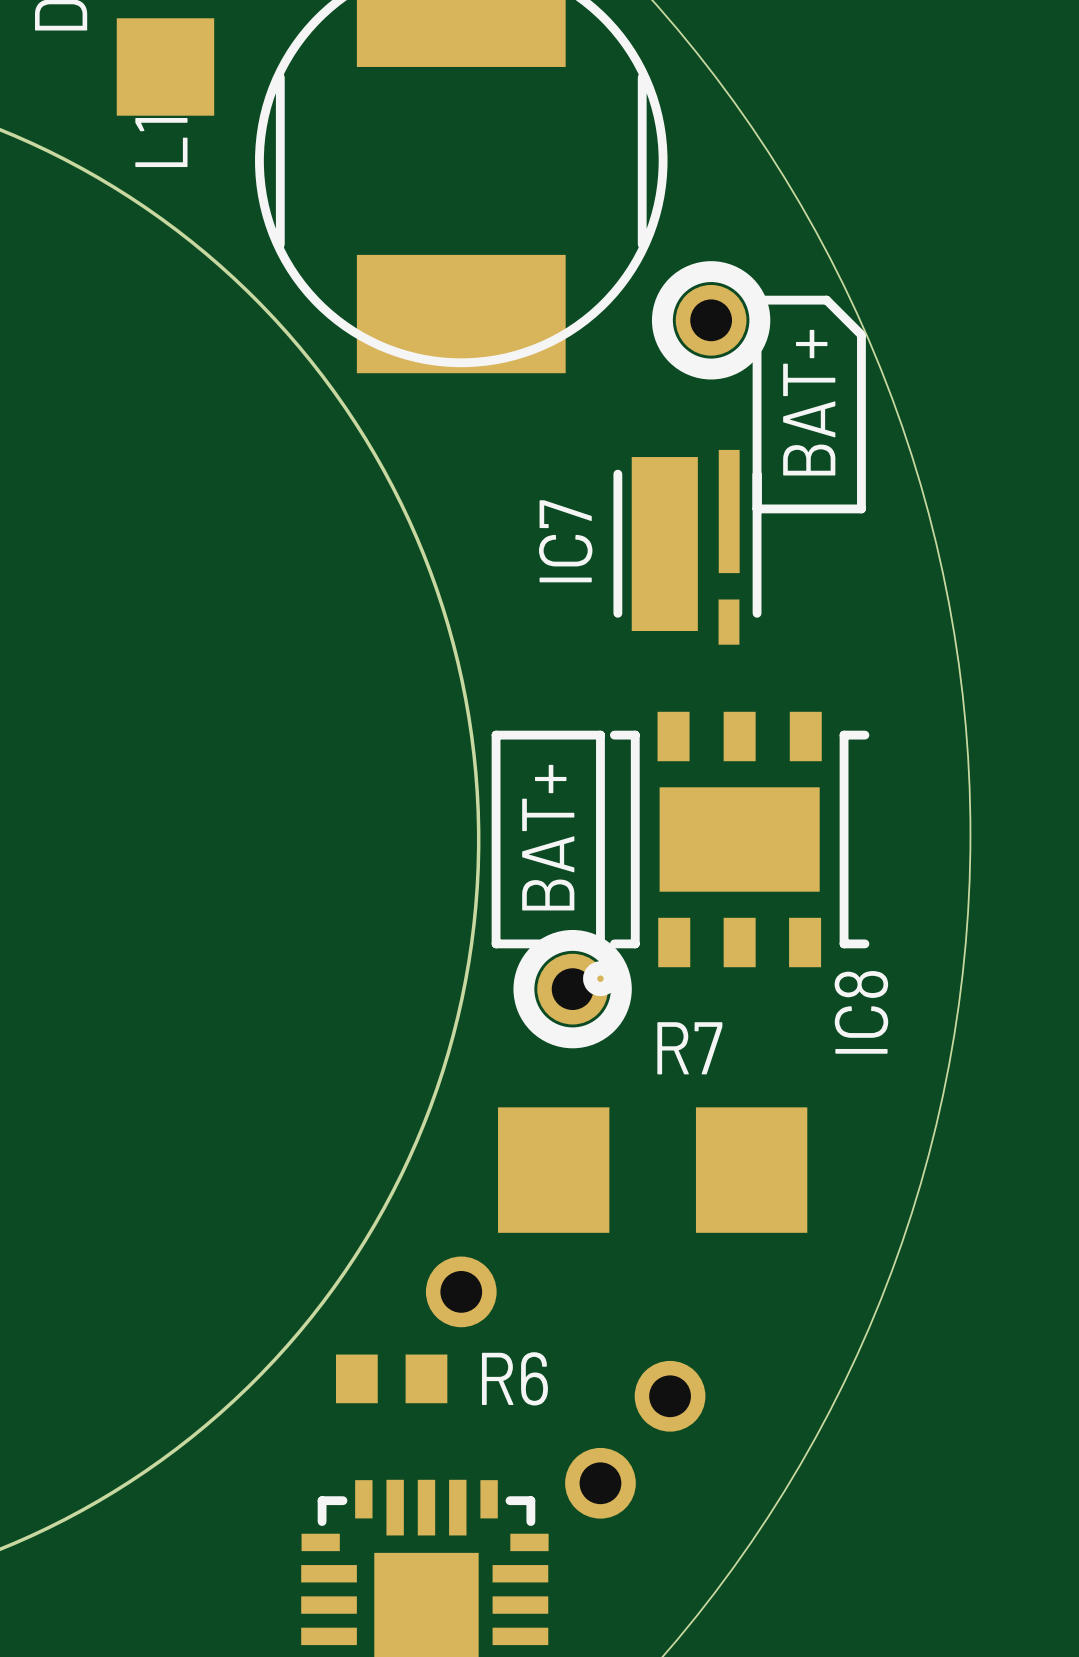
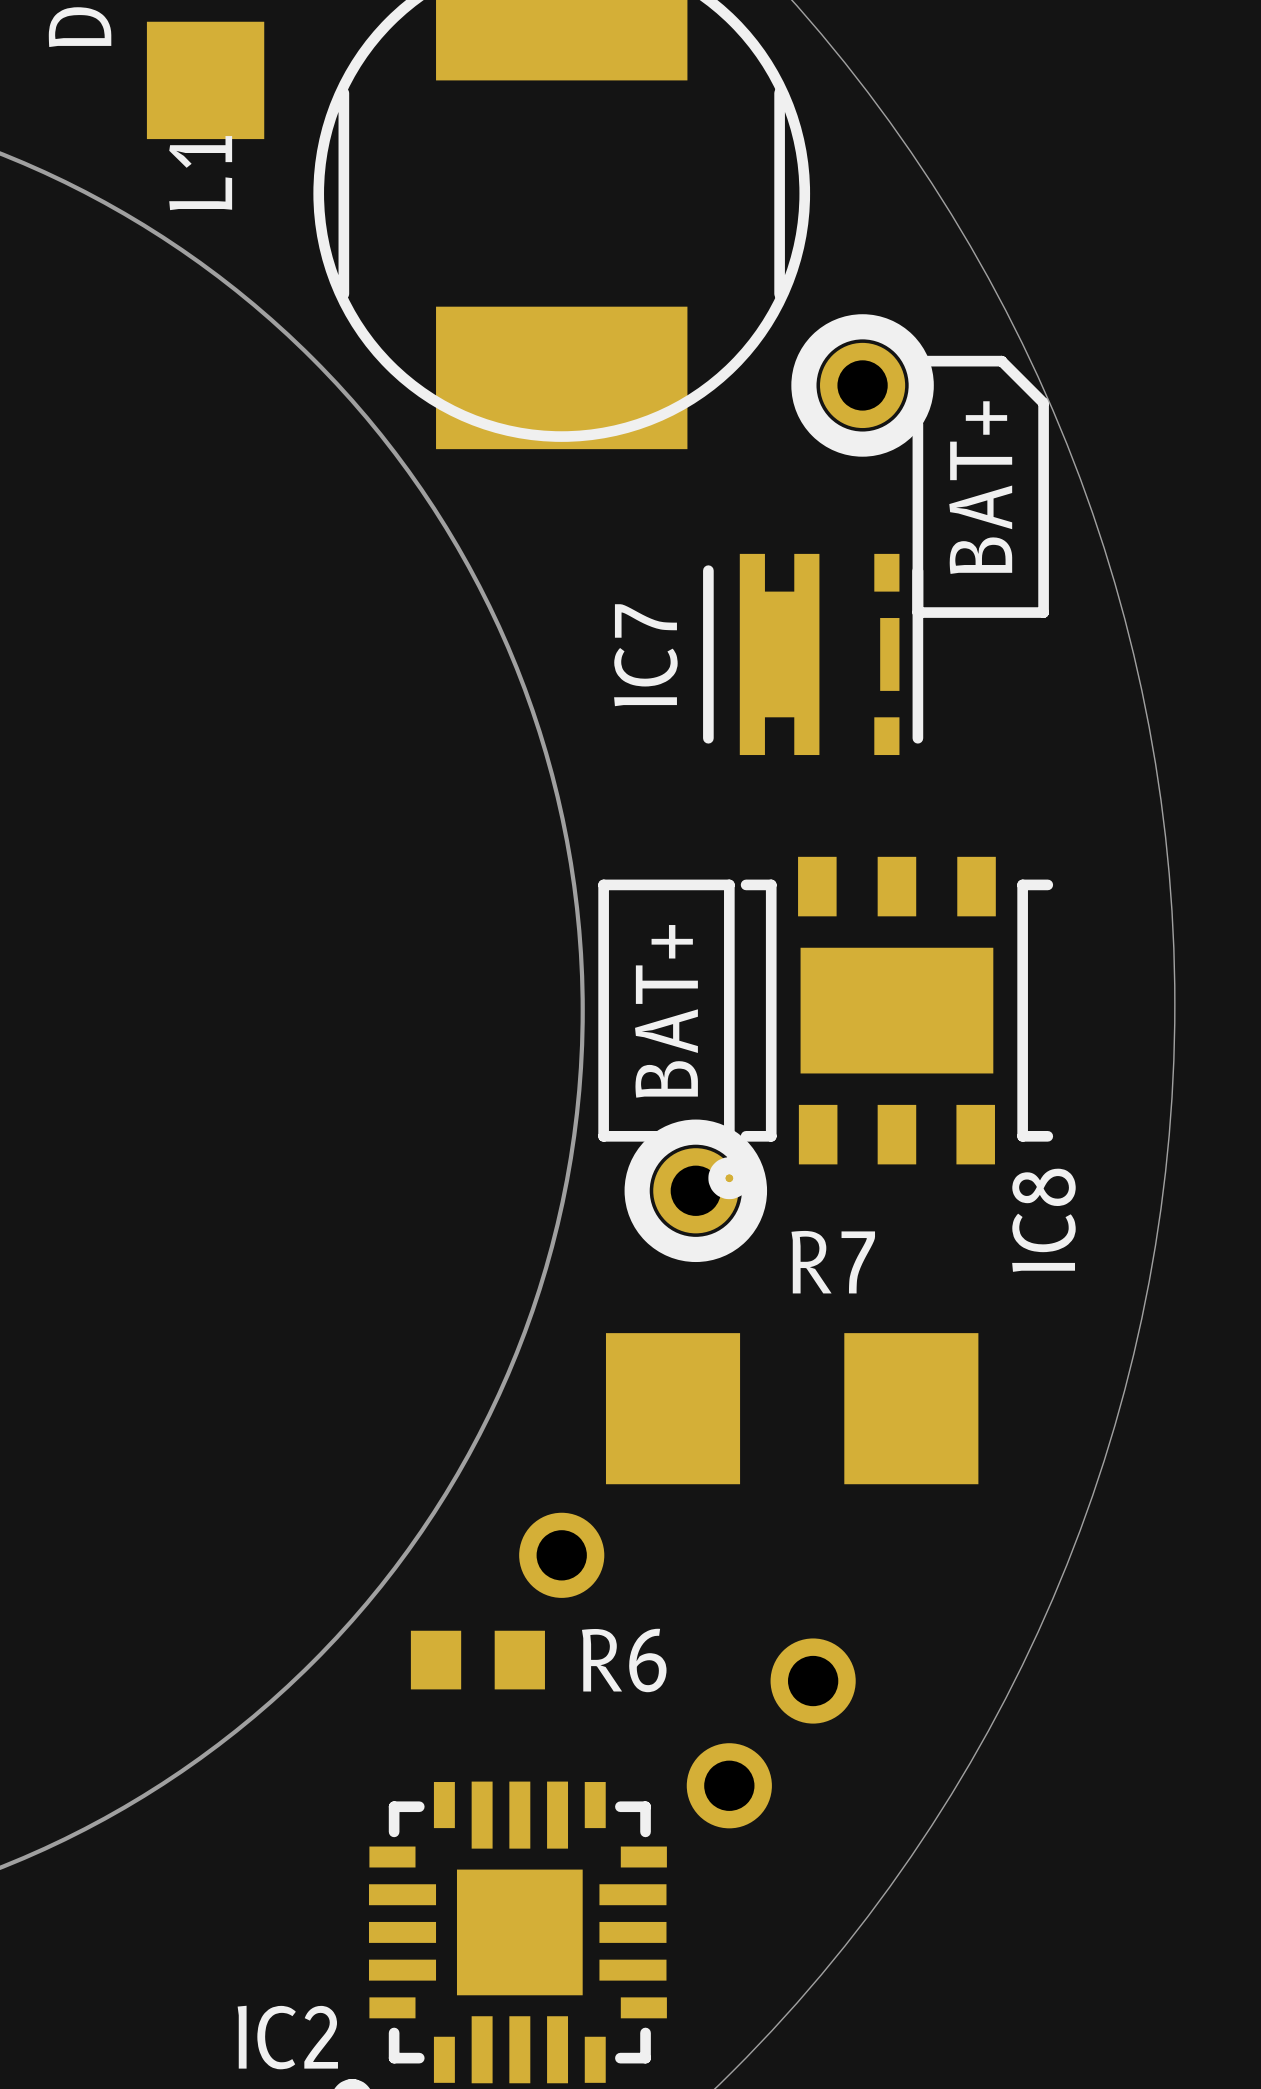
IC7 footprint: [613, 449, 762, 645] -> [703, 553, 924, 756]
IC7 name position: IC7 (565, 541) -> IC7 (645, 655)

